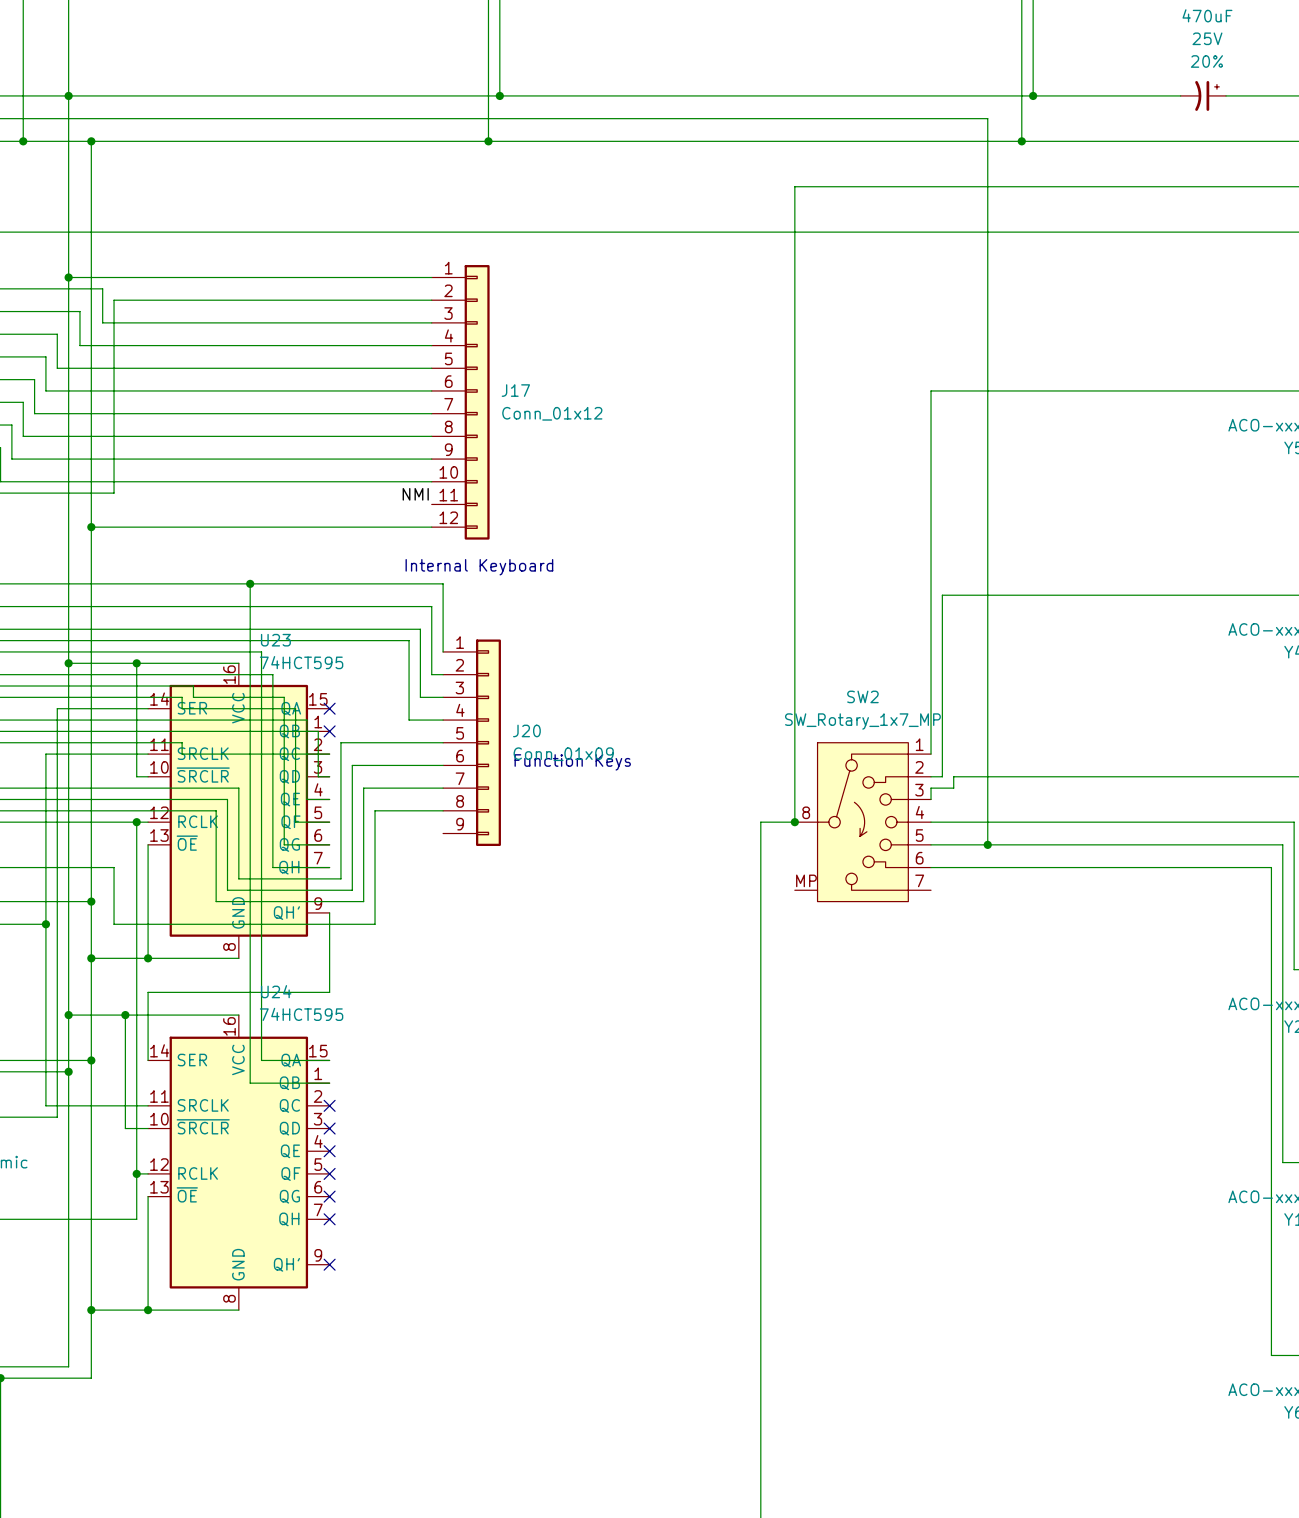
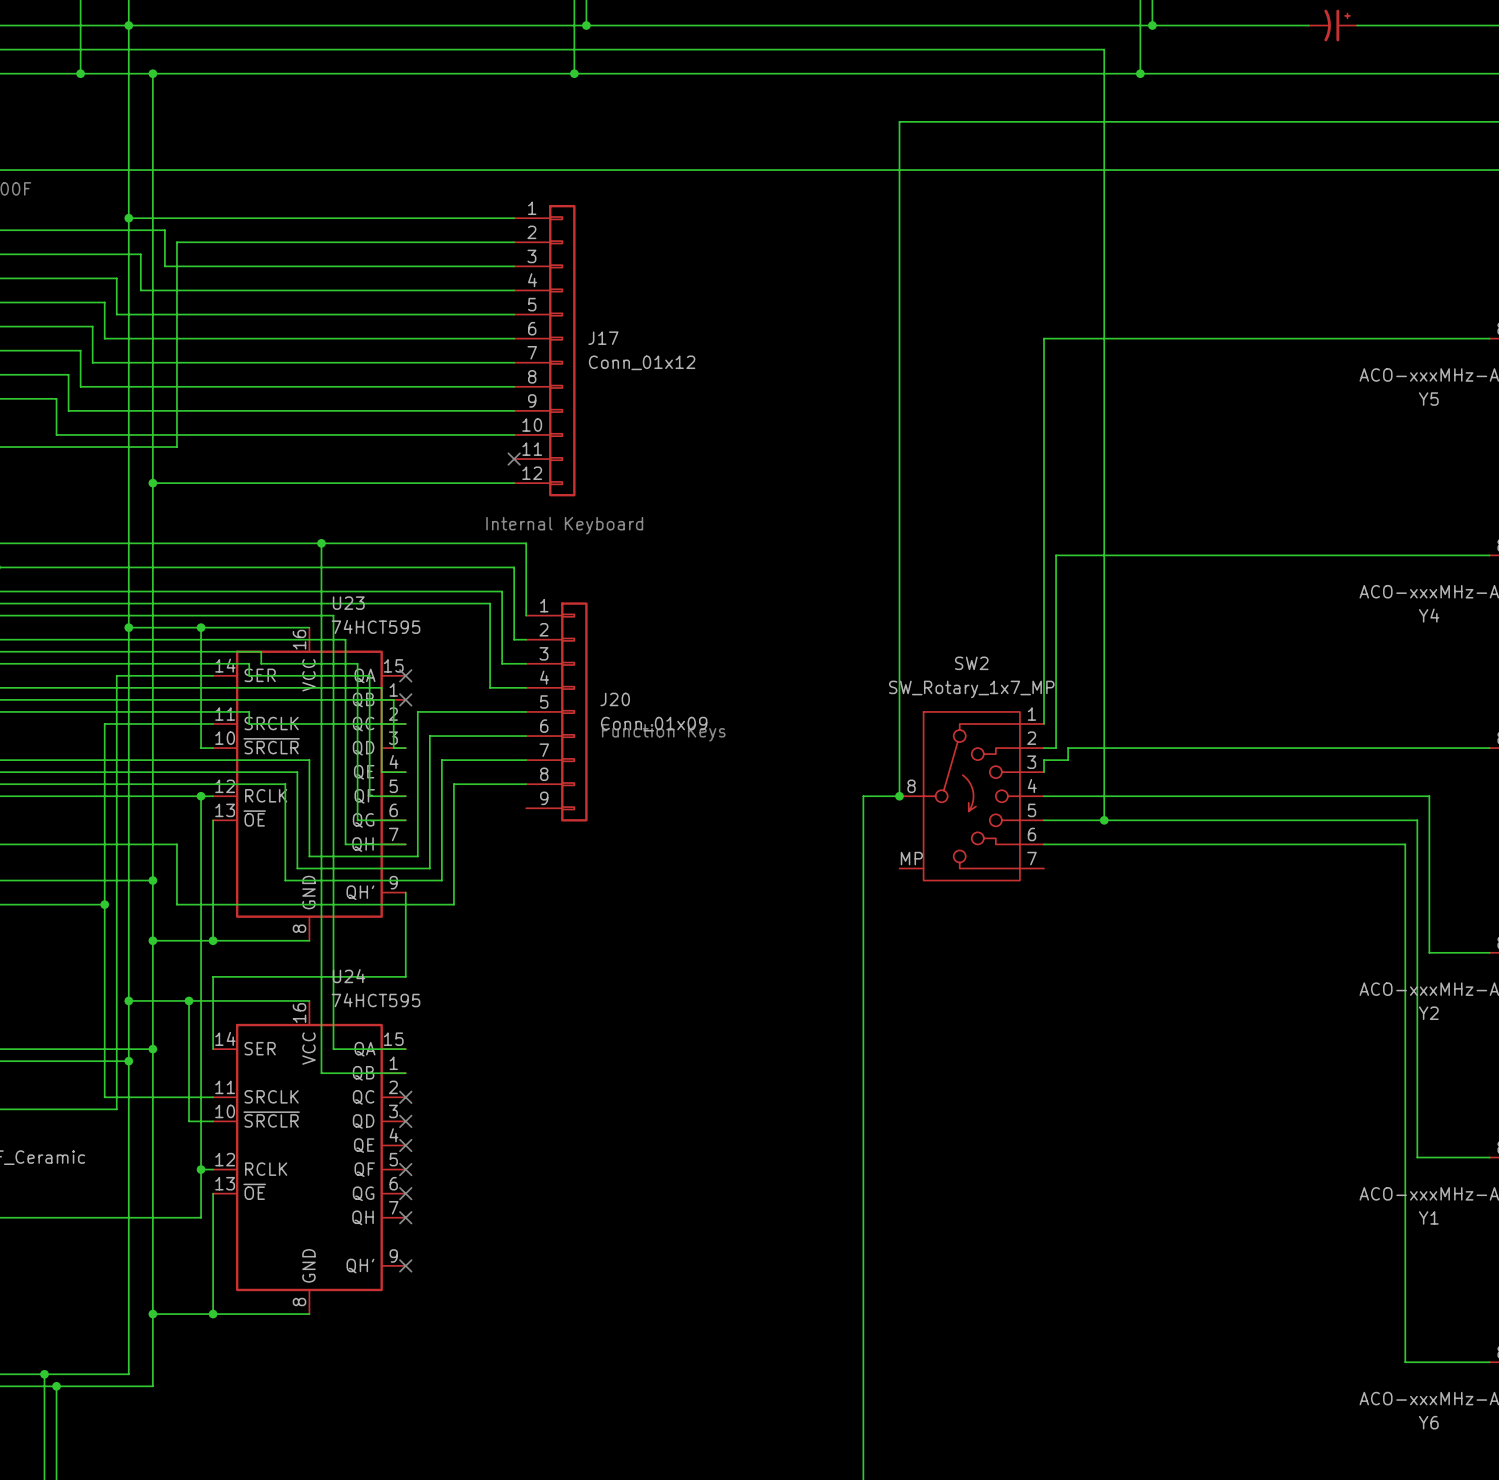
label: NMI (415, 494) -> none
no-connect mark: none -> (514, 459)

